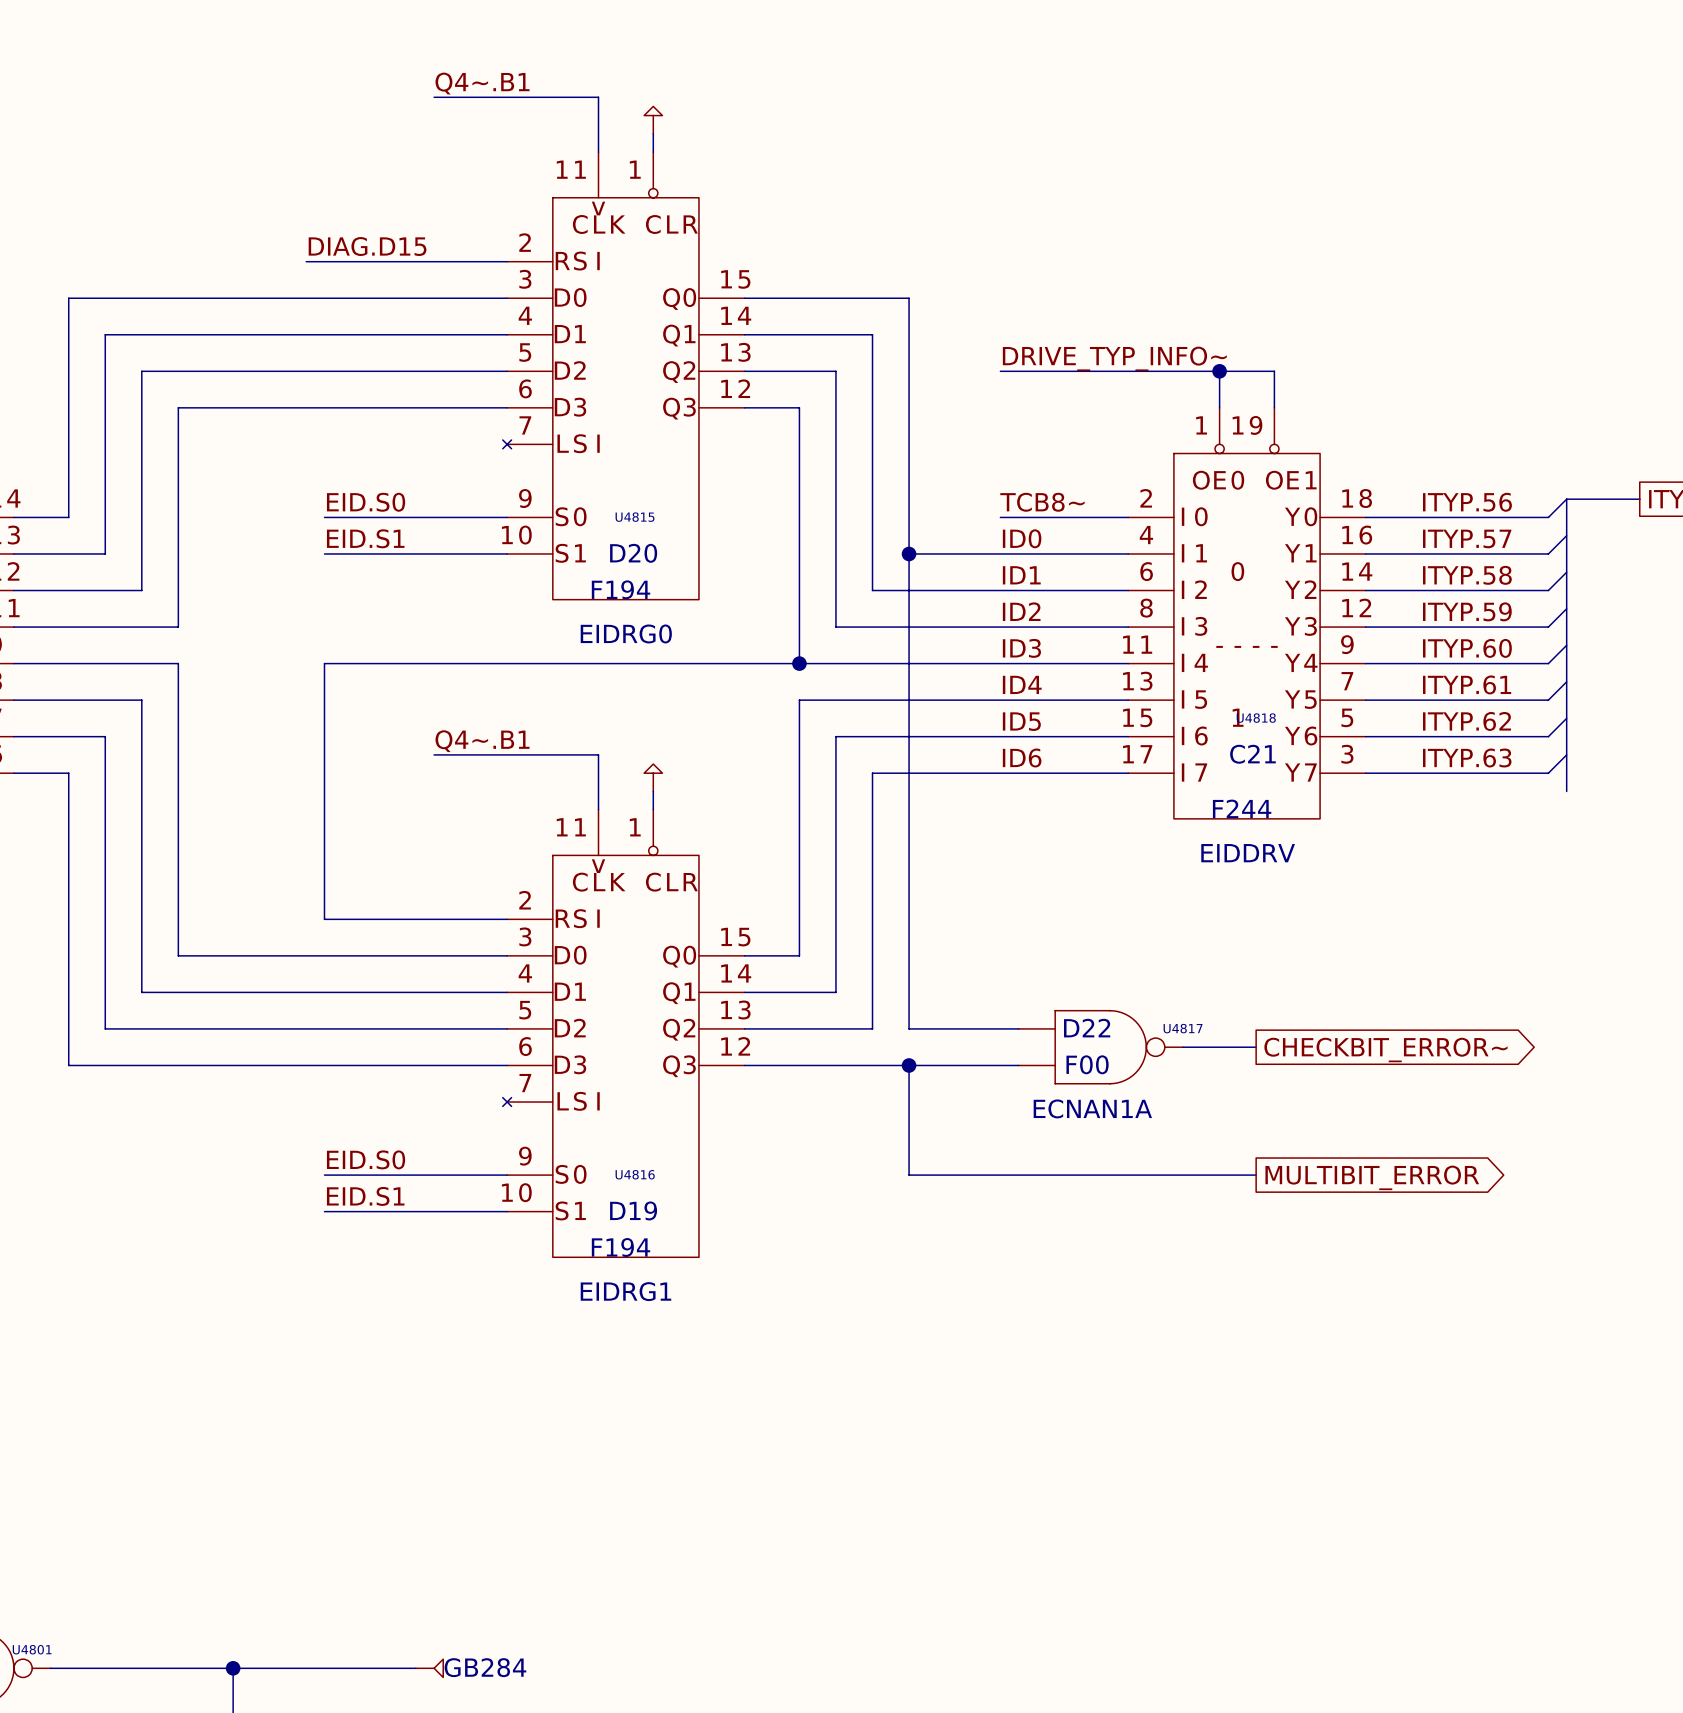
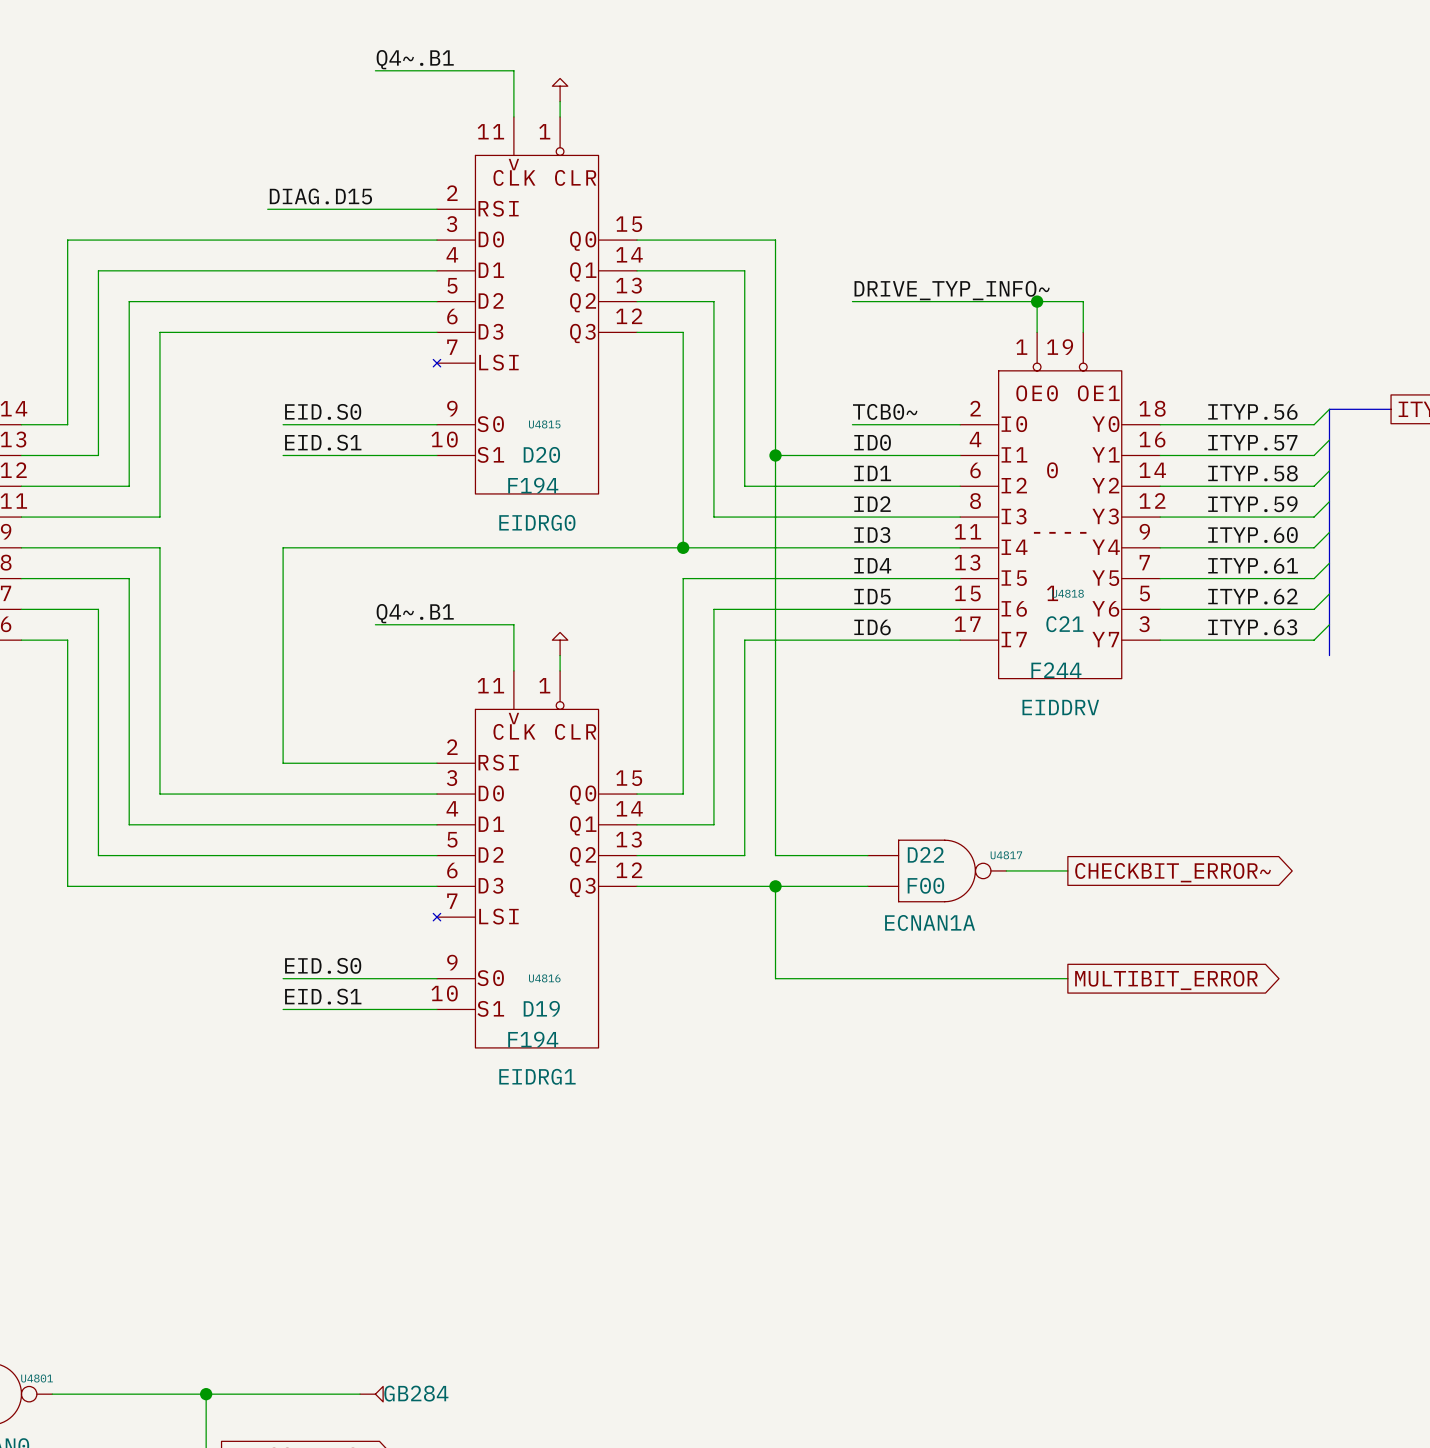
label: TCB8~ (1042, 502) -> TCB0~ (885, 411)

